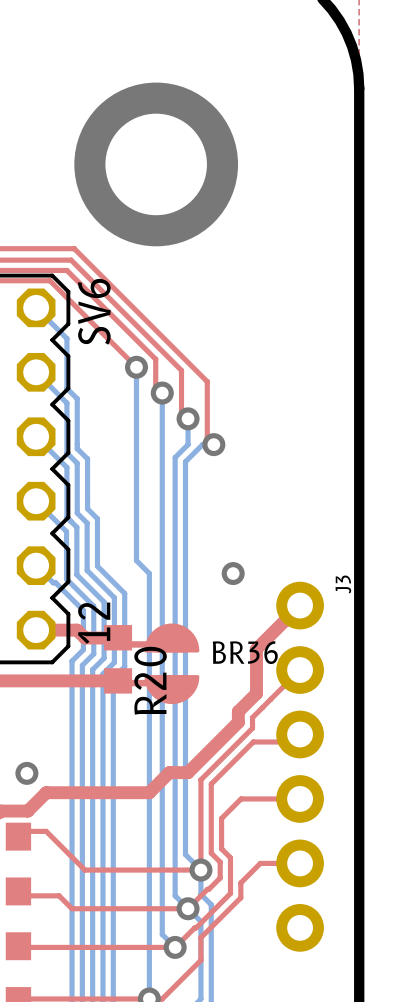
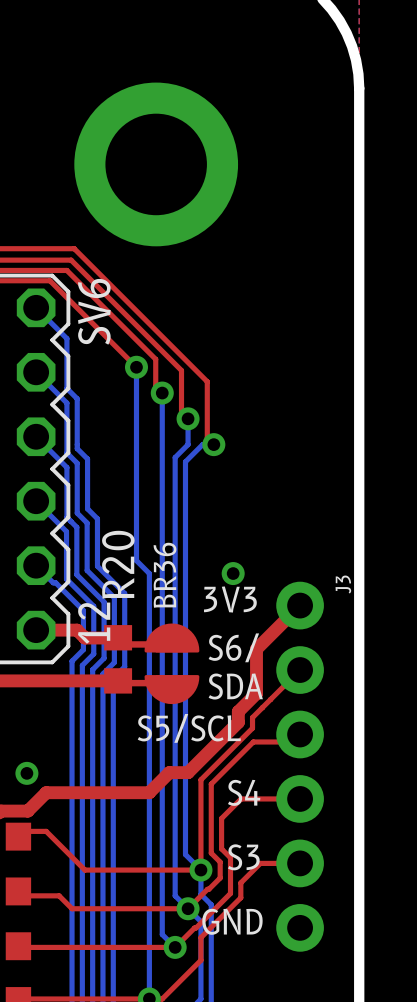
text: none -> 3V3 (230, 599)
text: none -> S6/ (233, 647)
BR36 name rotation: 0° (245, 652) -> 90° counterclockwise (165, 575)
BR36 name position: BR36 (245, 652) -> BR36 (165, 575)
R20 name position: R20 (150, 680) -> R20 (118, 564)
text: none -> SDA (235, 686)
text: none -> S5/SCL (189, 728)
text: none -> S4 (244, 792)
text: none -> S3 (243, 857)
text: none -> GND (232, 921)

